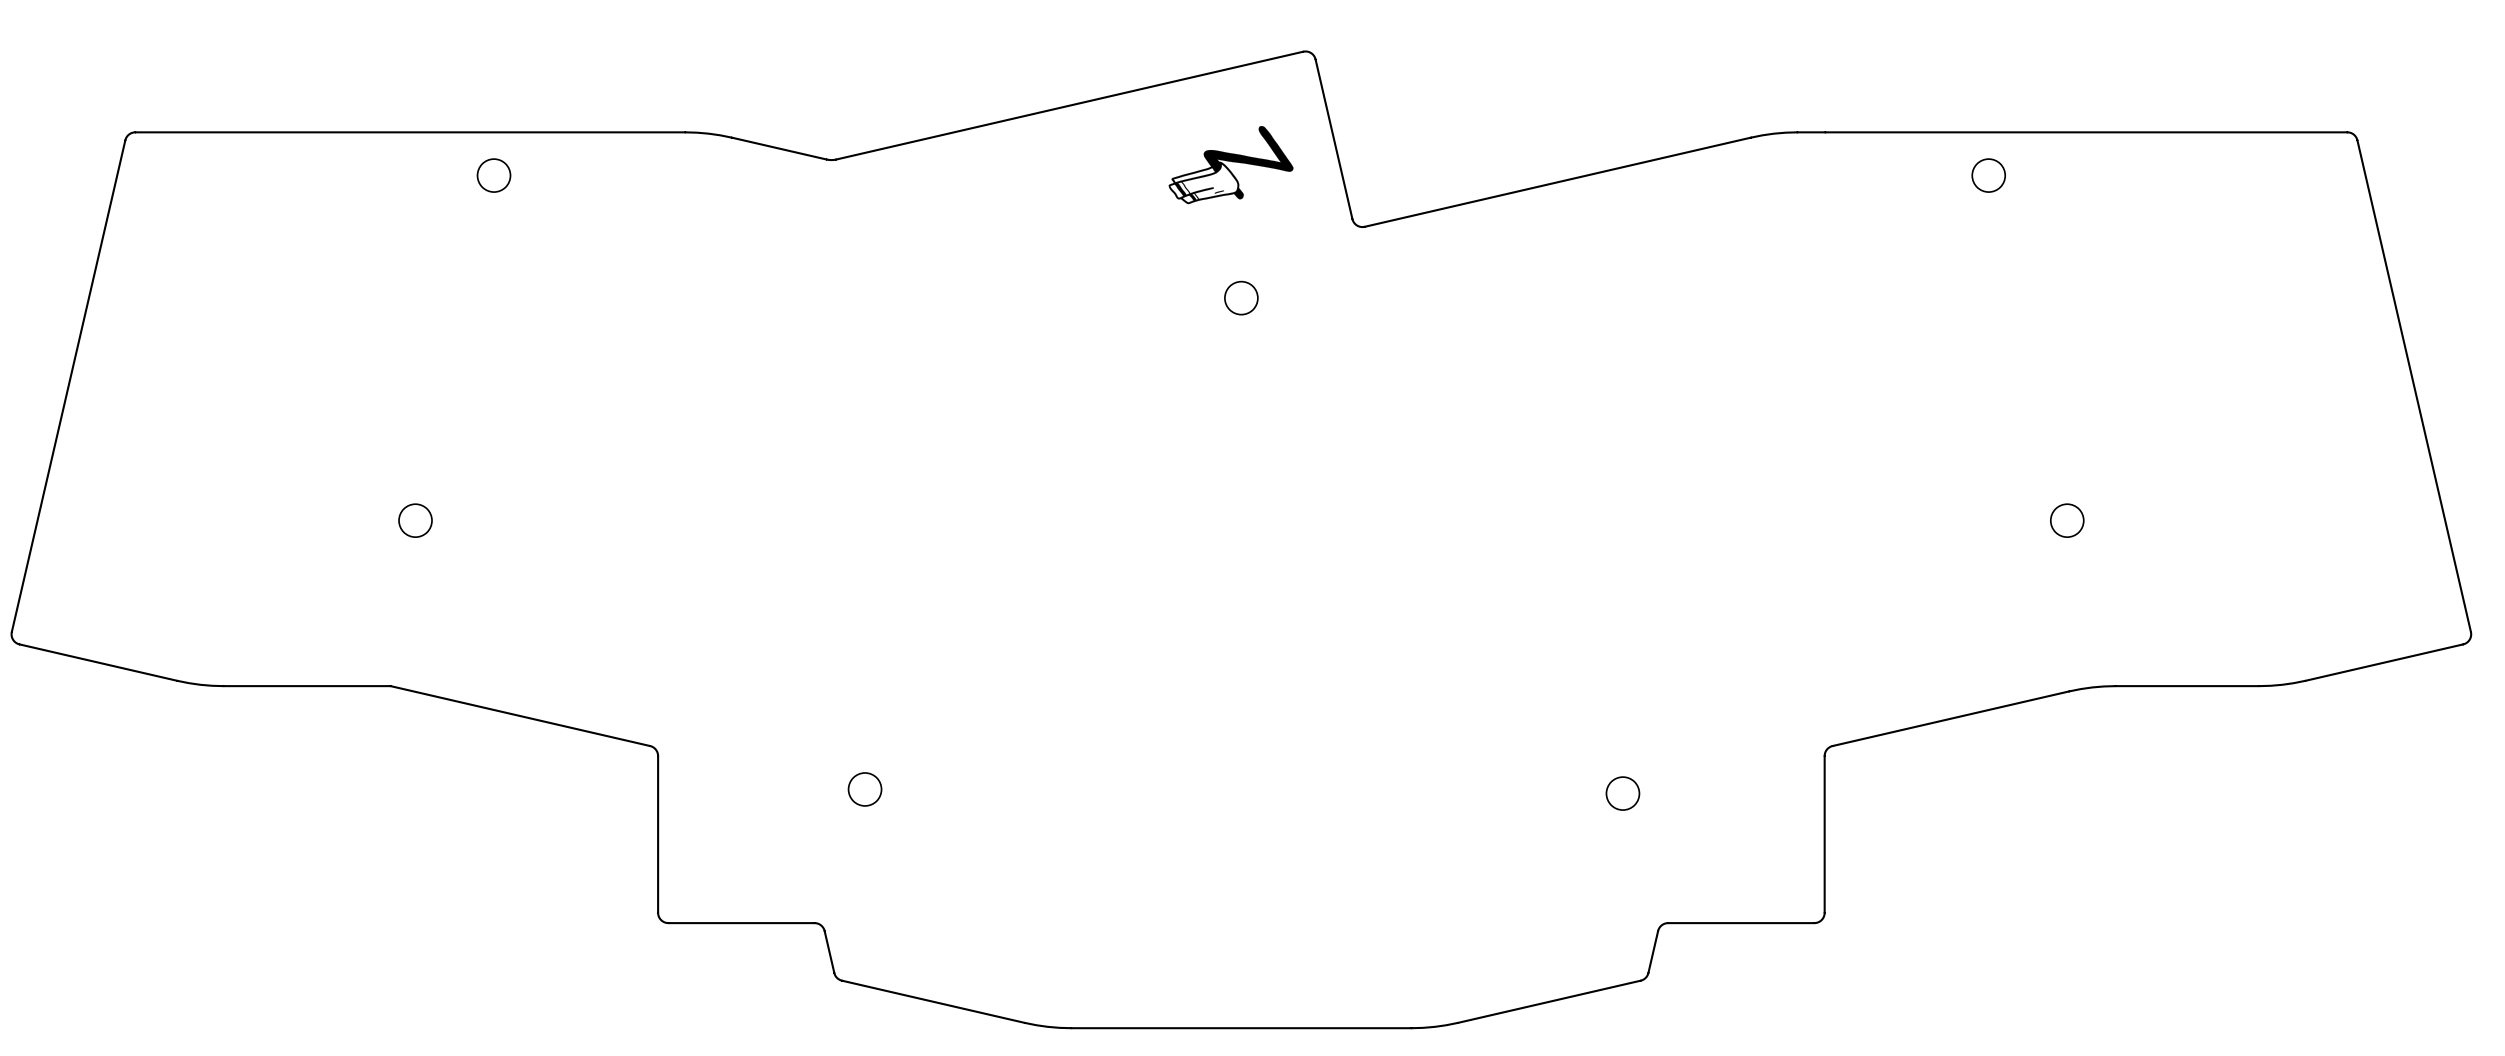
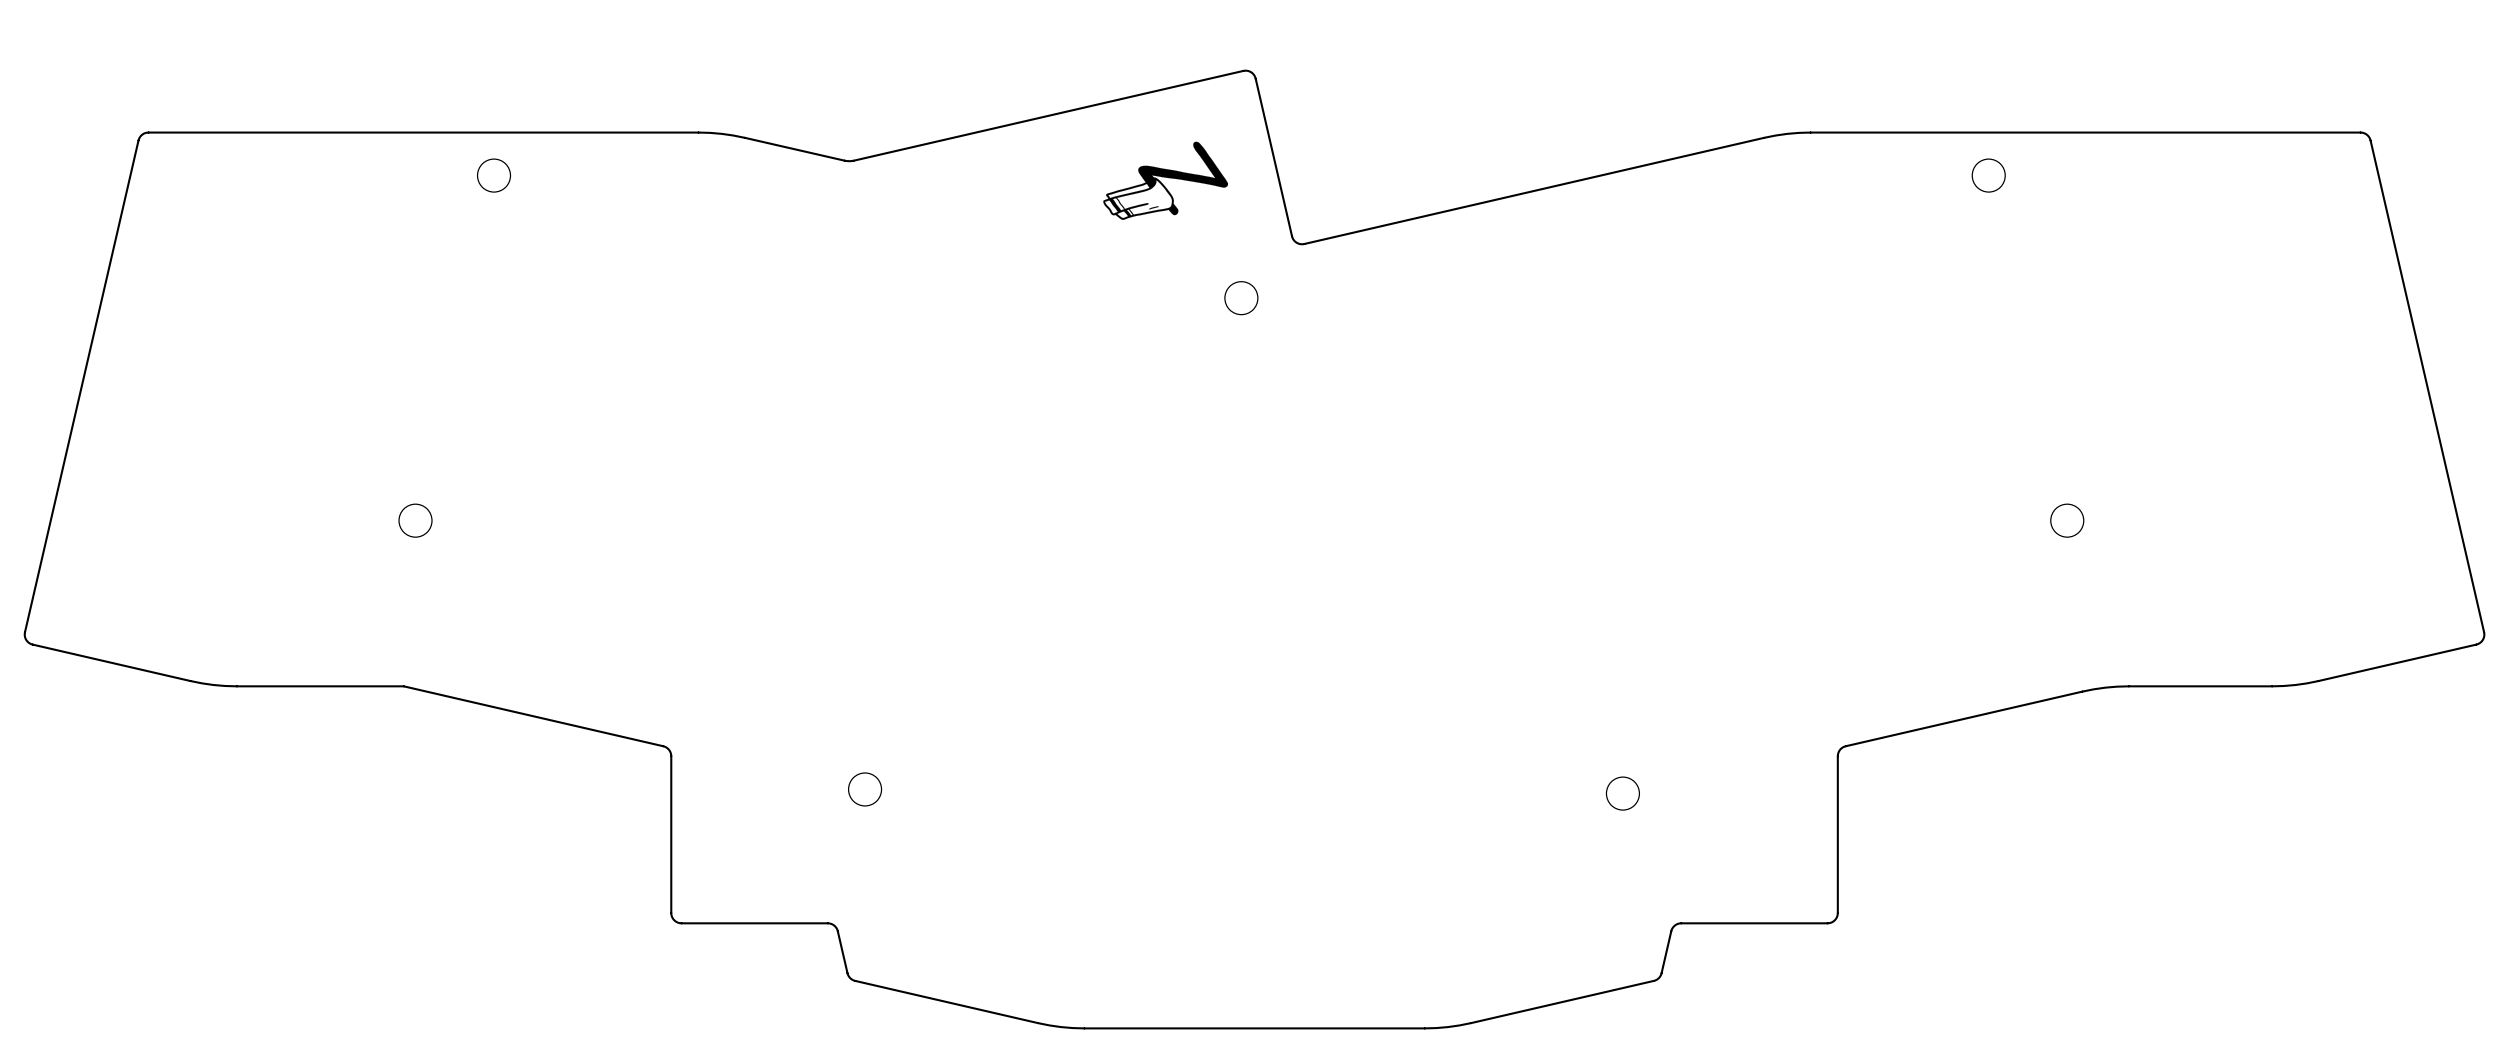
drawing: [10, 50, 2473, 1030] -> none
drawing: none -> [23, 69, 2486, 1030]
drawing position: (1231, 165) -> (1165, 180)

